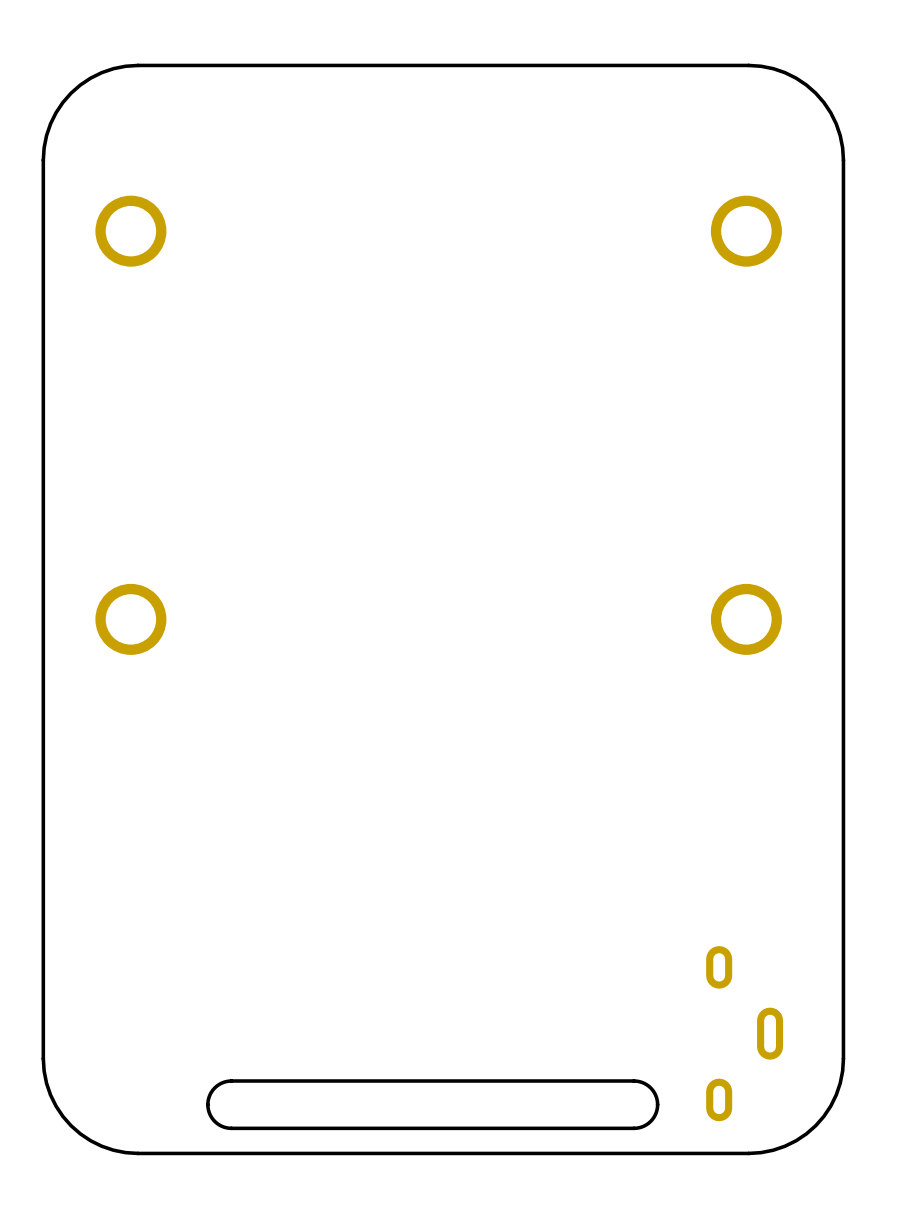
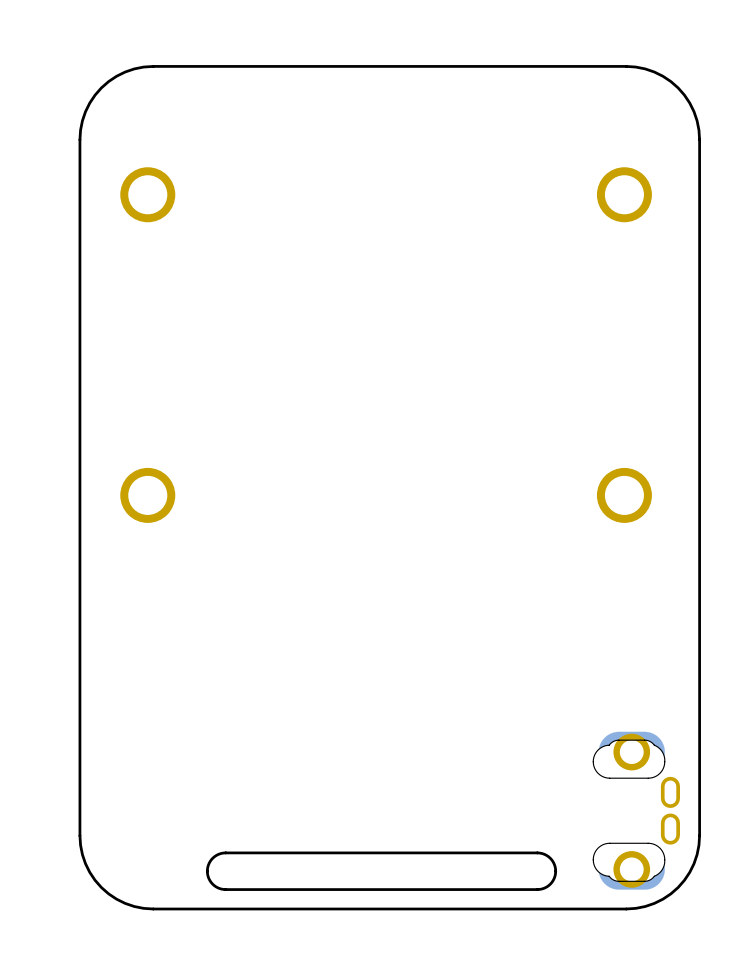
part footprint: [706, 946, 784, 1122] -> [593, 731, 680, 890]

